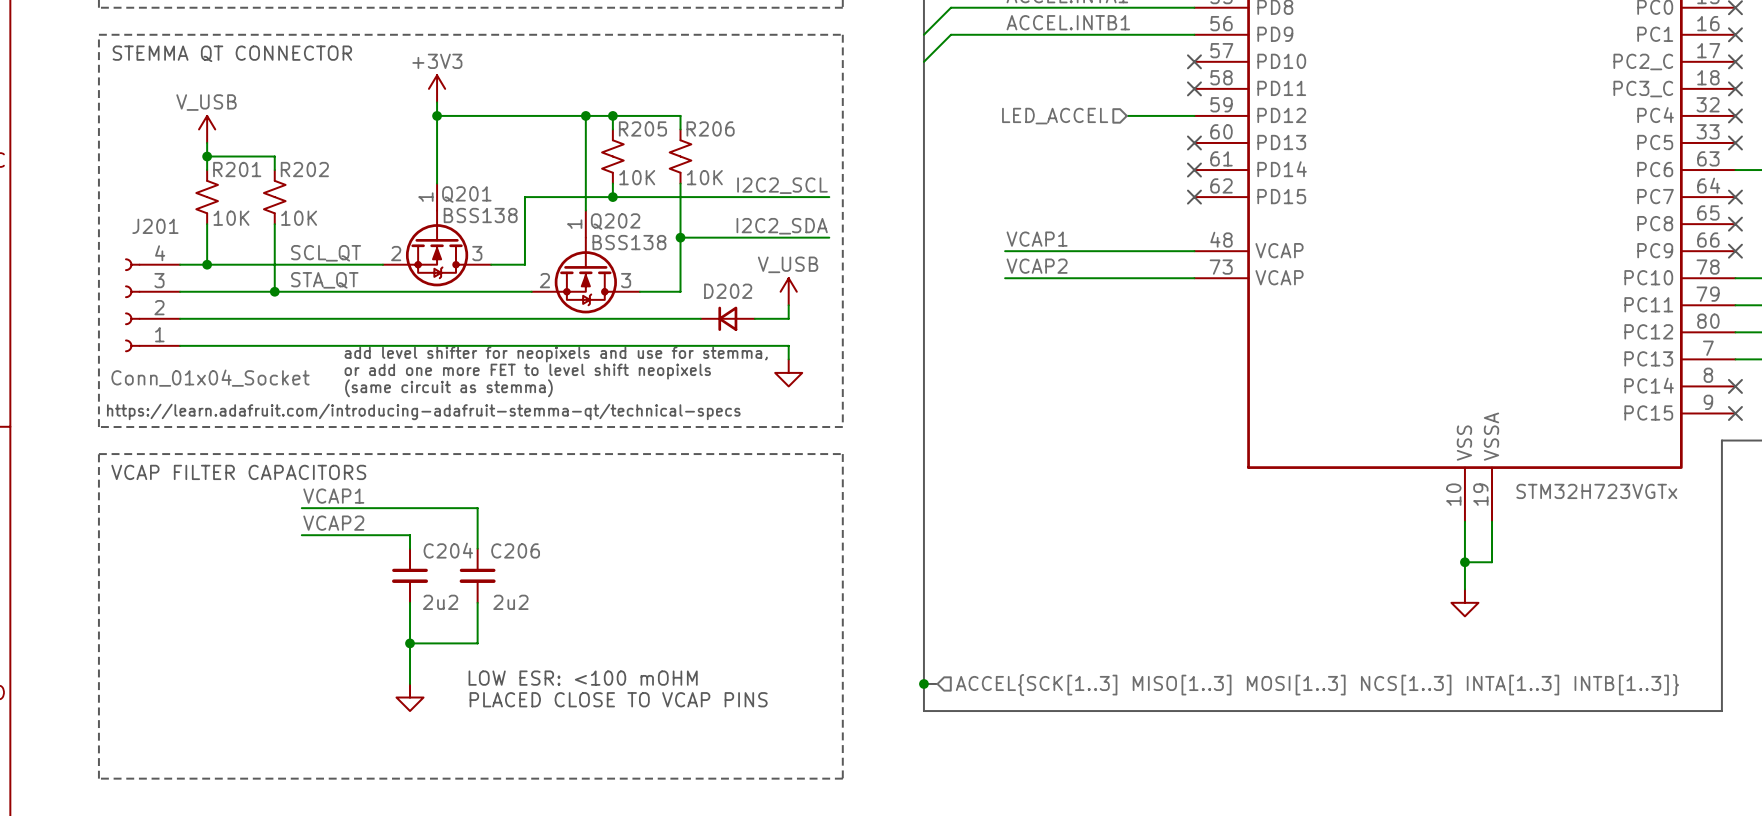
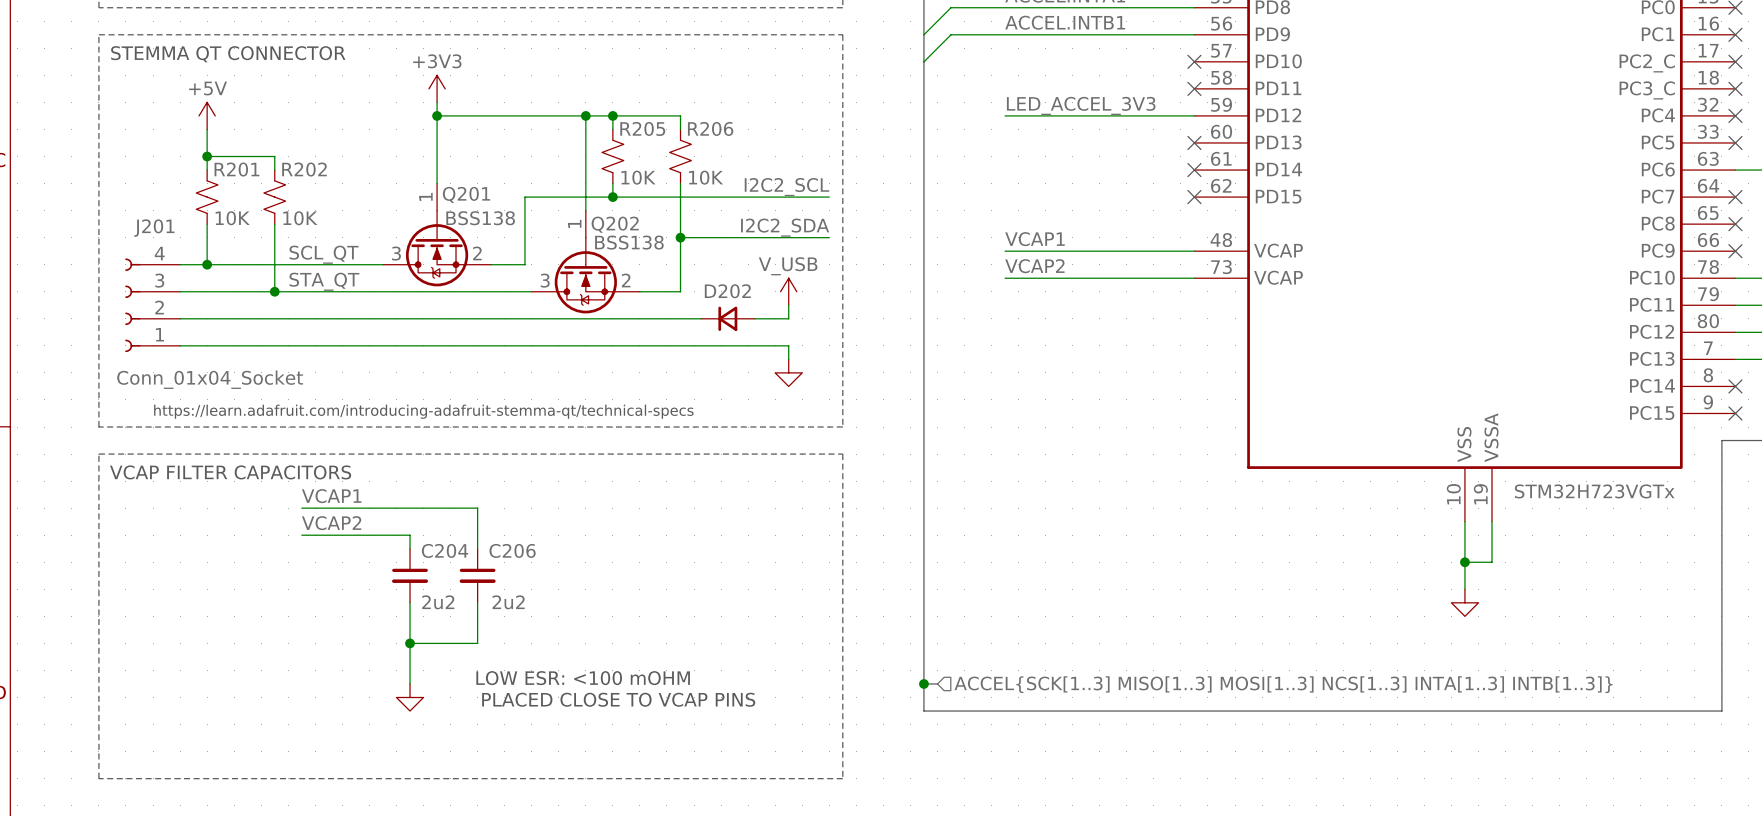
label: none -> LED_ACCEL_3V3 (1081, 105)
power symbol: none -> +5V (207, 115)
wire: none -> (1005, 115) (1126, 115)
hierarchical label: LED_ACCEL (1055, 116) -> none
power symbol: V_USB (207, 129) -> none
Q201 flip: as is (437, 248) -> left-right (437, 248)
Q202 flip: as is (585, 275) -> left-right (585, 275)
text: add level shifter for neopixels and use for stemma, (556, 354) -> none
text: or add one more FET to level shift neopixels (527, 371) -> none
text: (same circuit as stemma) (448, 388) -> none

